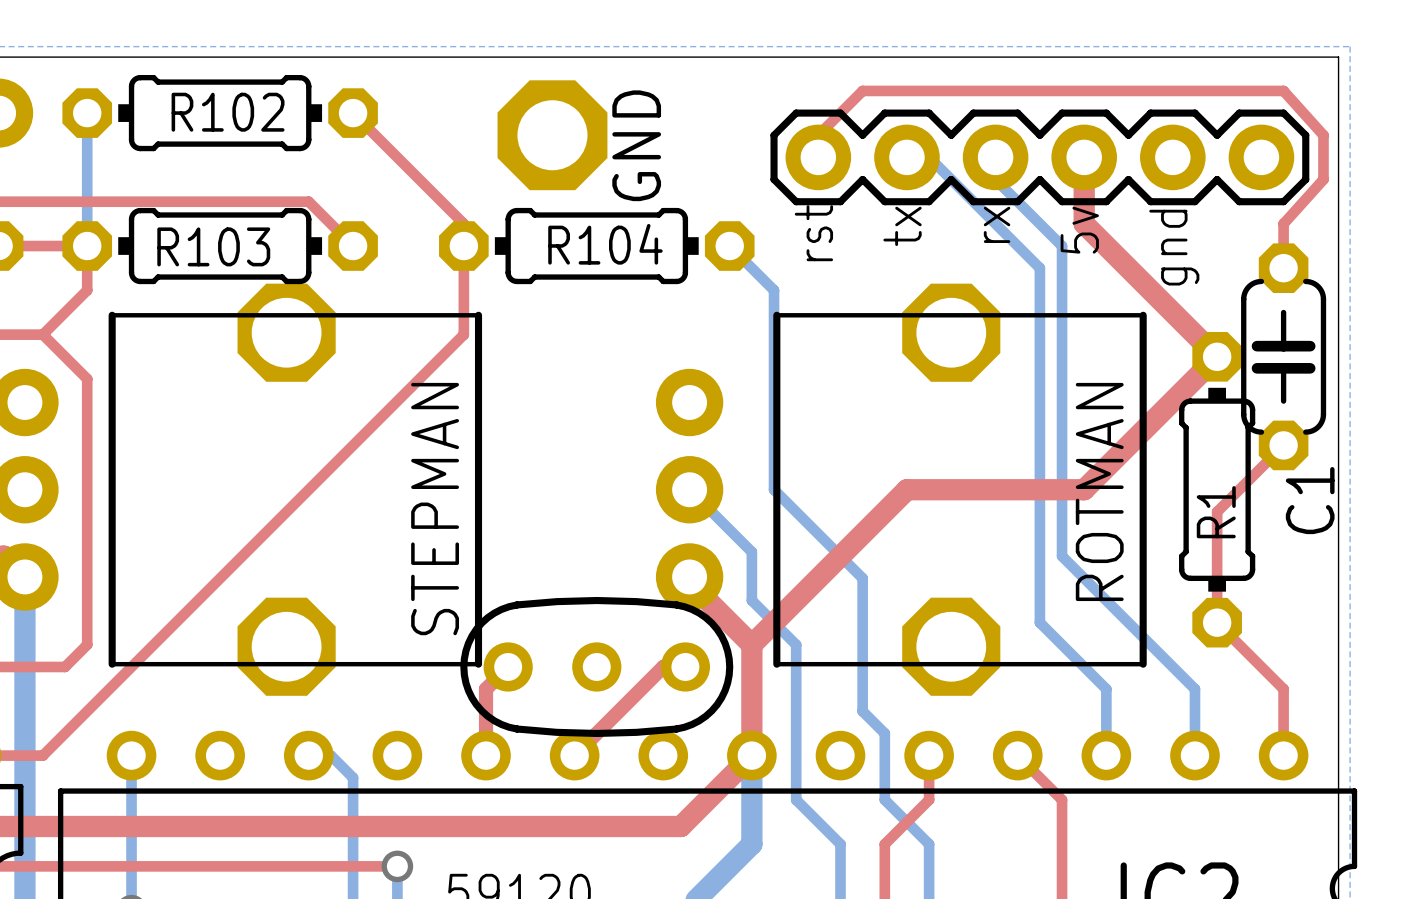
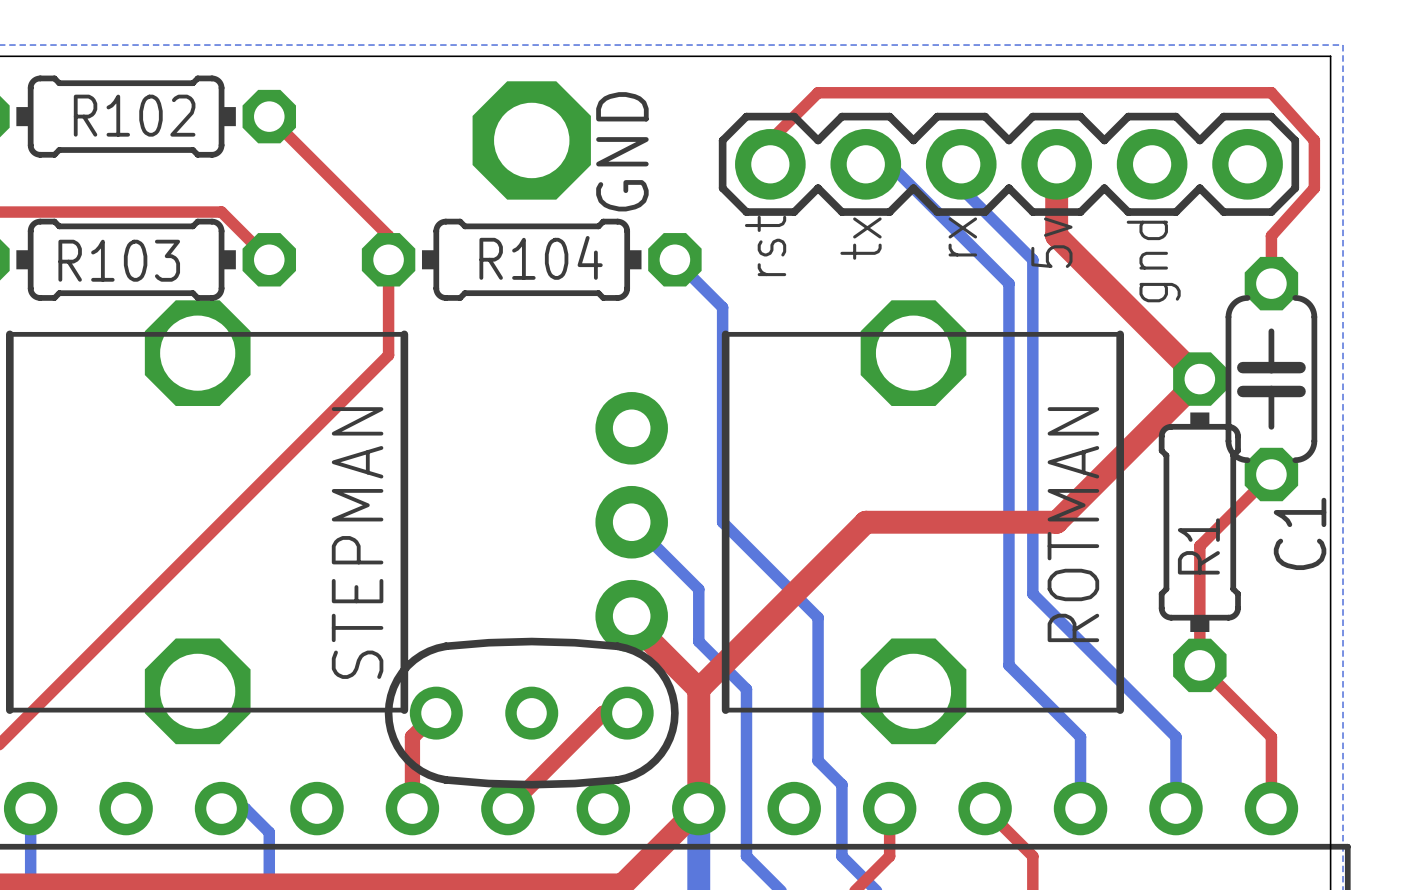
GND position: (552, 135) -> (531, 140)

